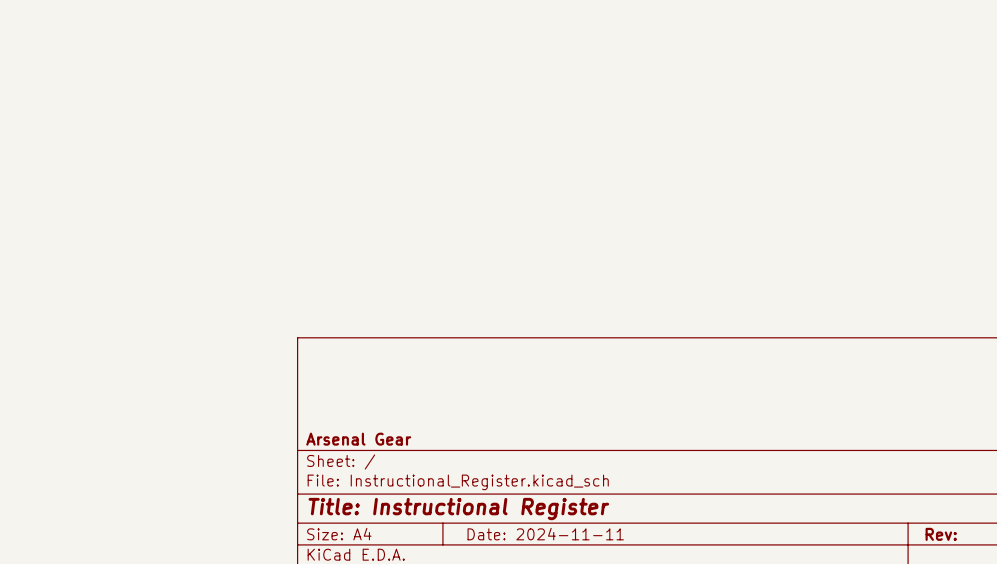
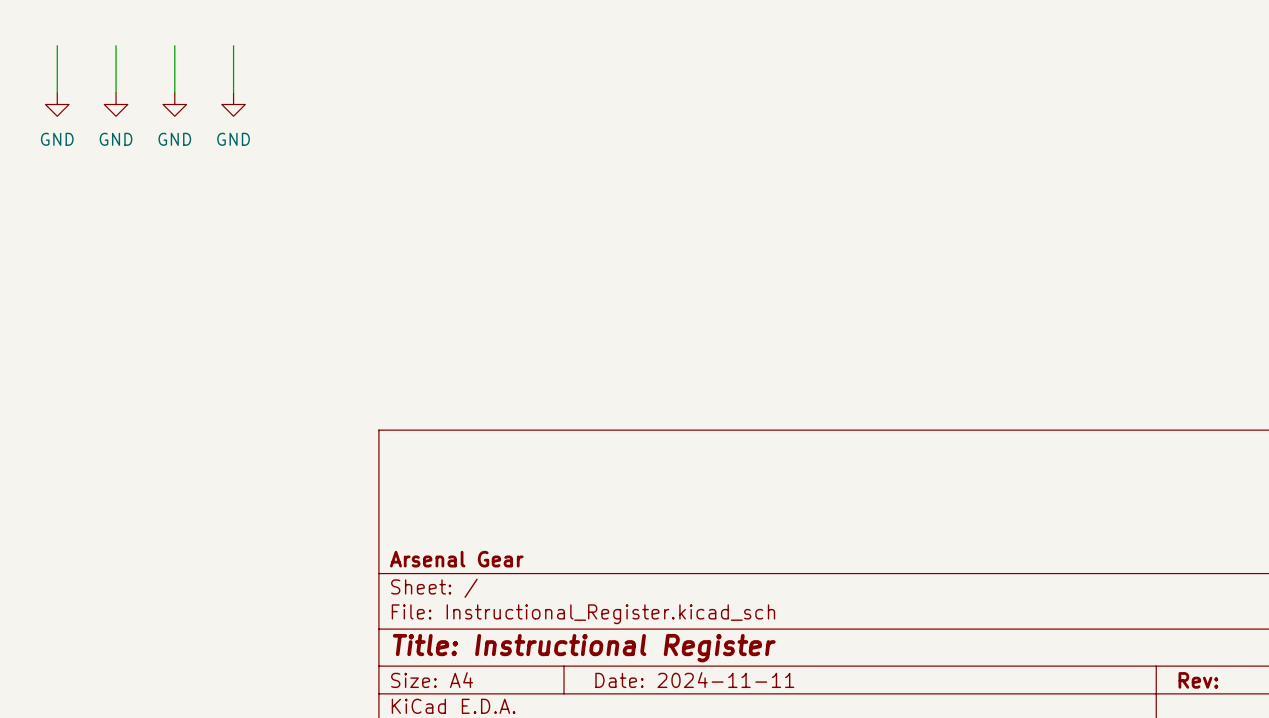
wire: none -> (57, 45) (57, 92)
wire: none -> (116, 45) (116, 92)
wire: none -> (174, 45) (174, 92)
wire: none -> (233, 45) (233, 92)
power symbol: none -> GND (57, 104)
power symbol: none -> GND (116, 104)
power symbol: none -> GND (174, 104)
power symbol: none -> GND (233, 104)

